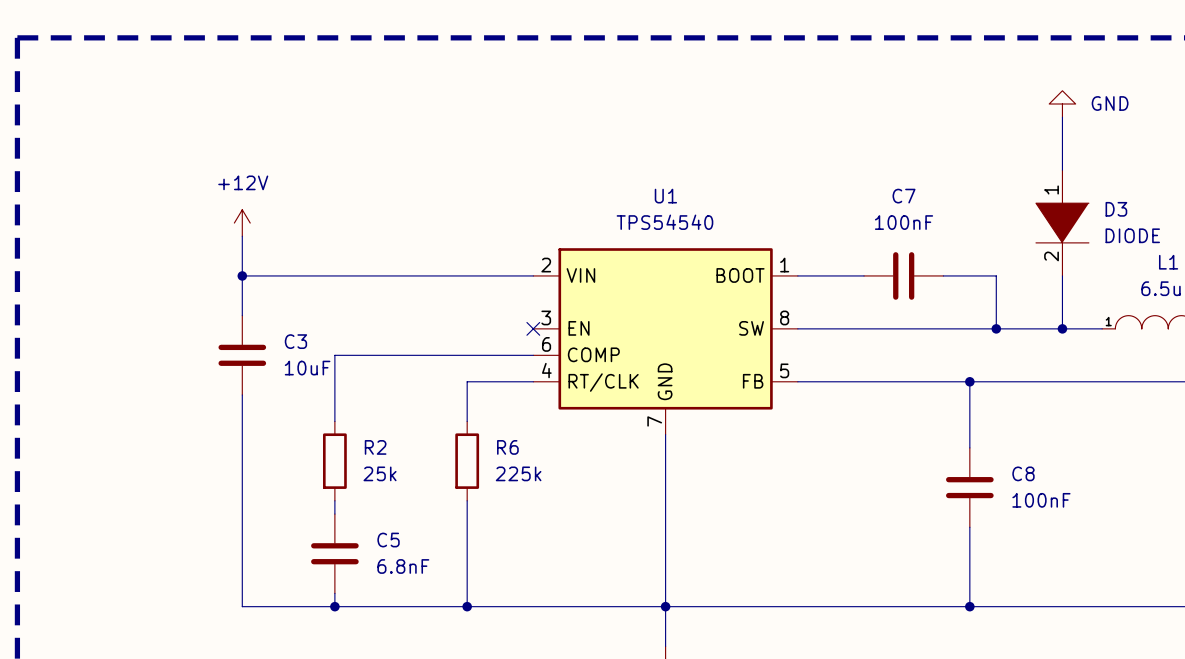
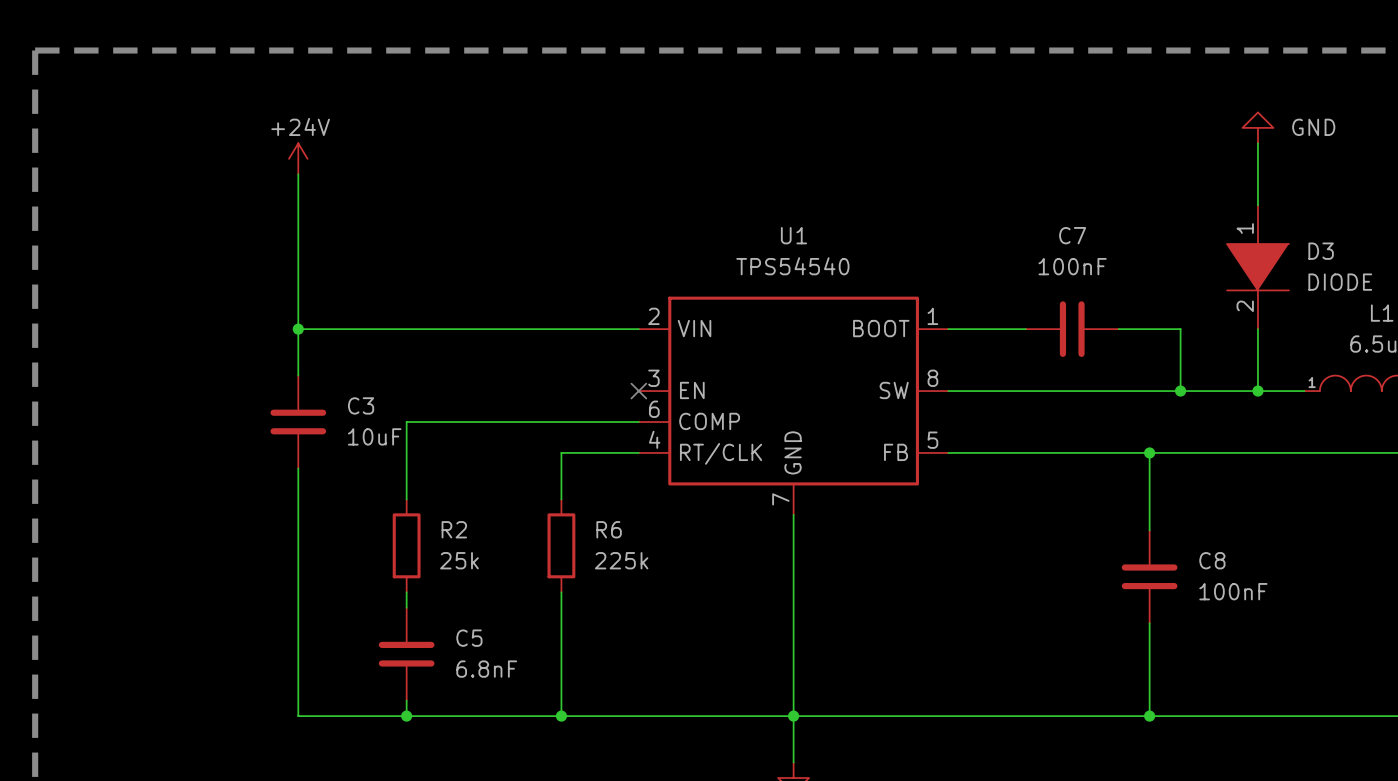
power symbol: none -> +24V (298, 158)
wire: none -> (298, 174) (298, 282)
power symbol: +12V (242, 223) -> none

